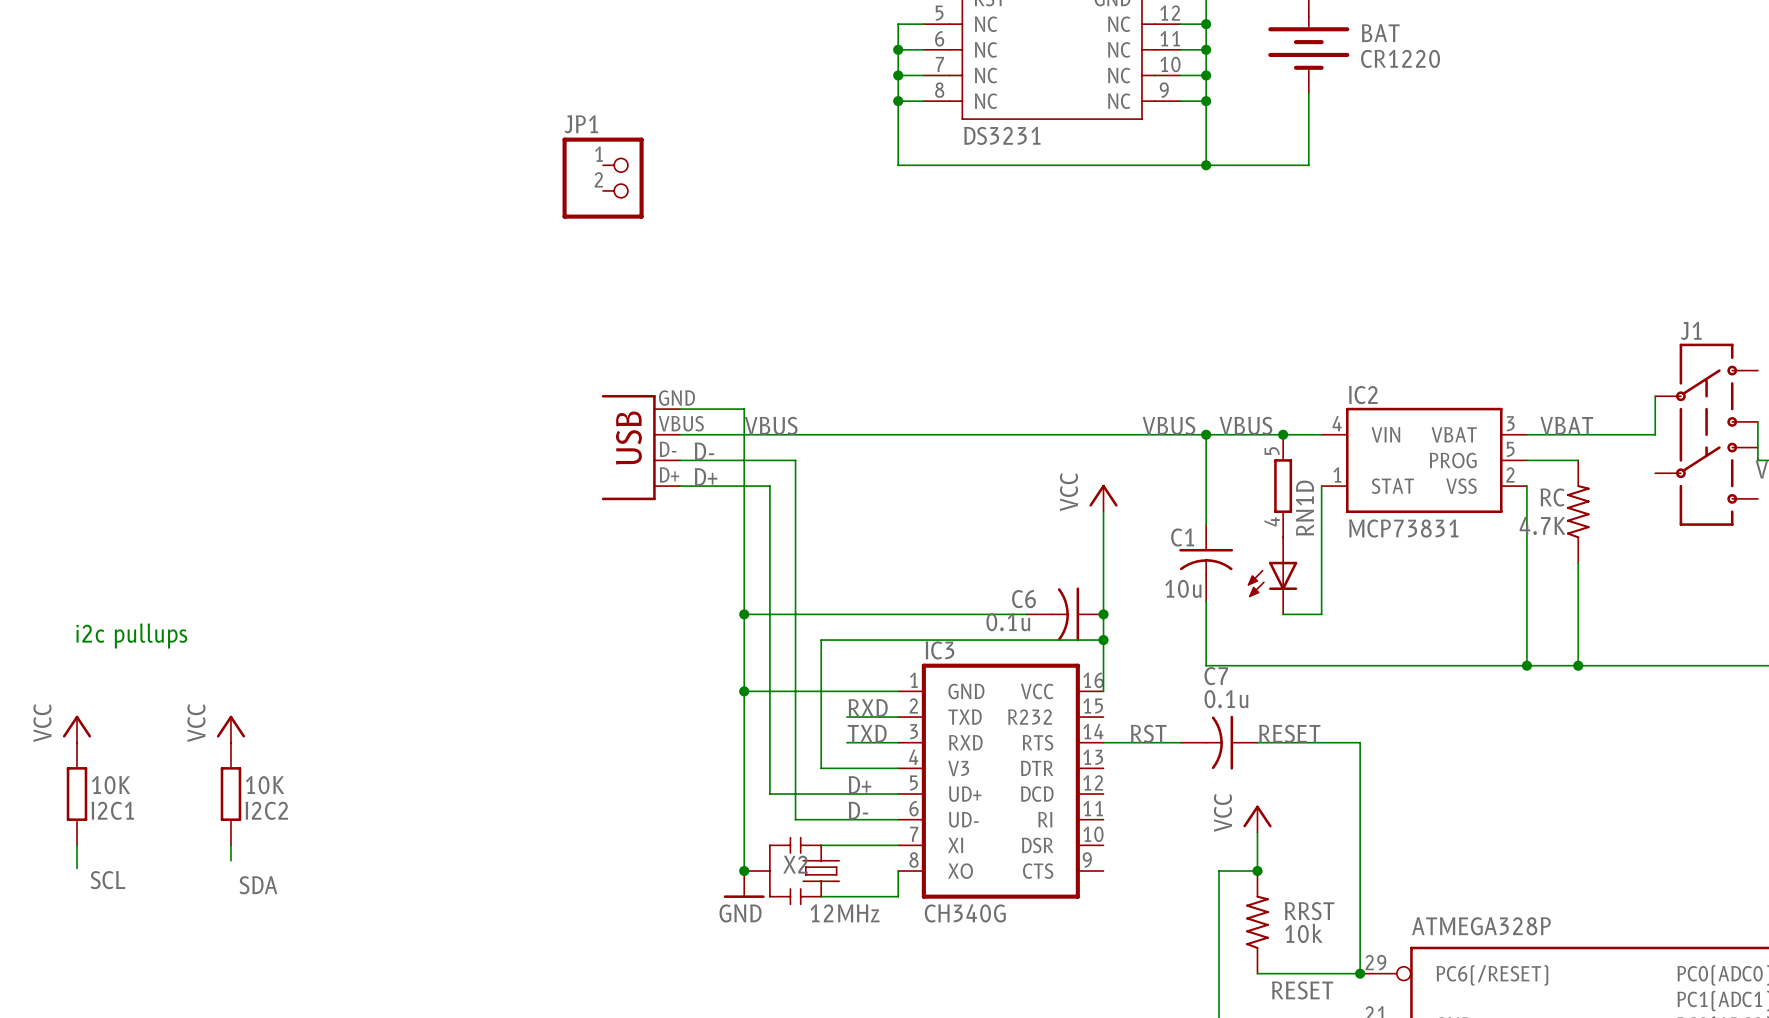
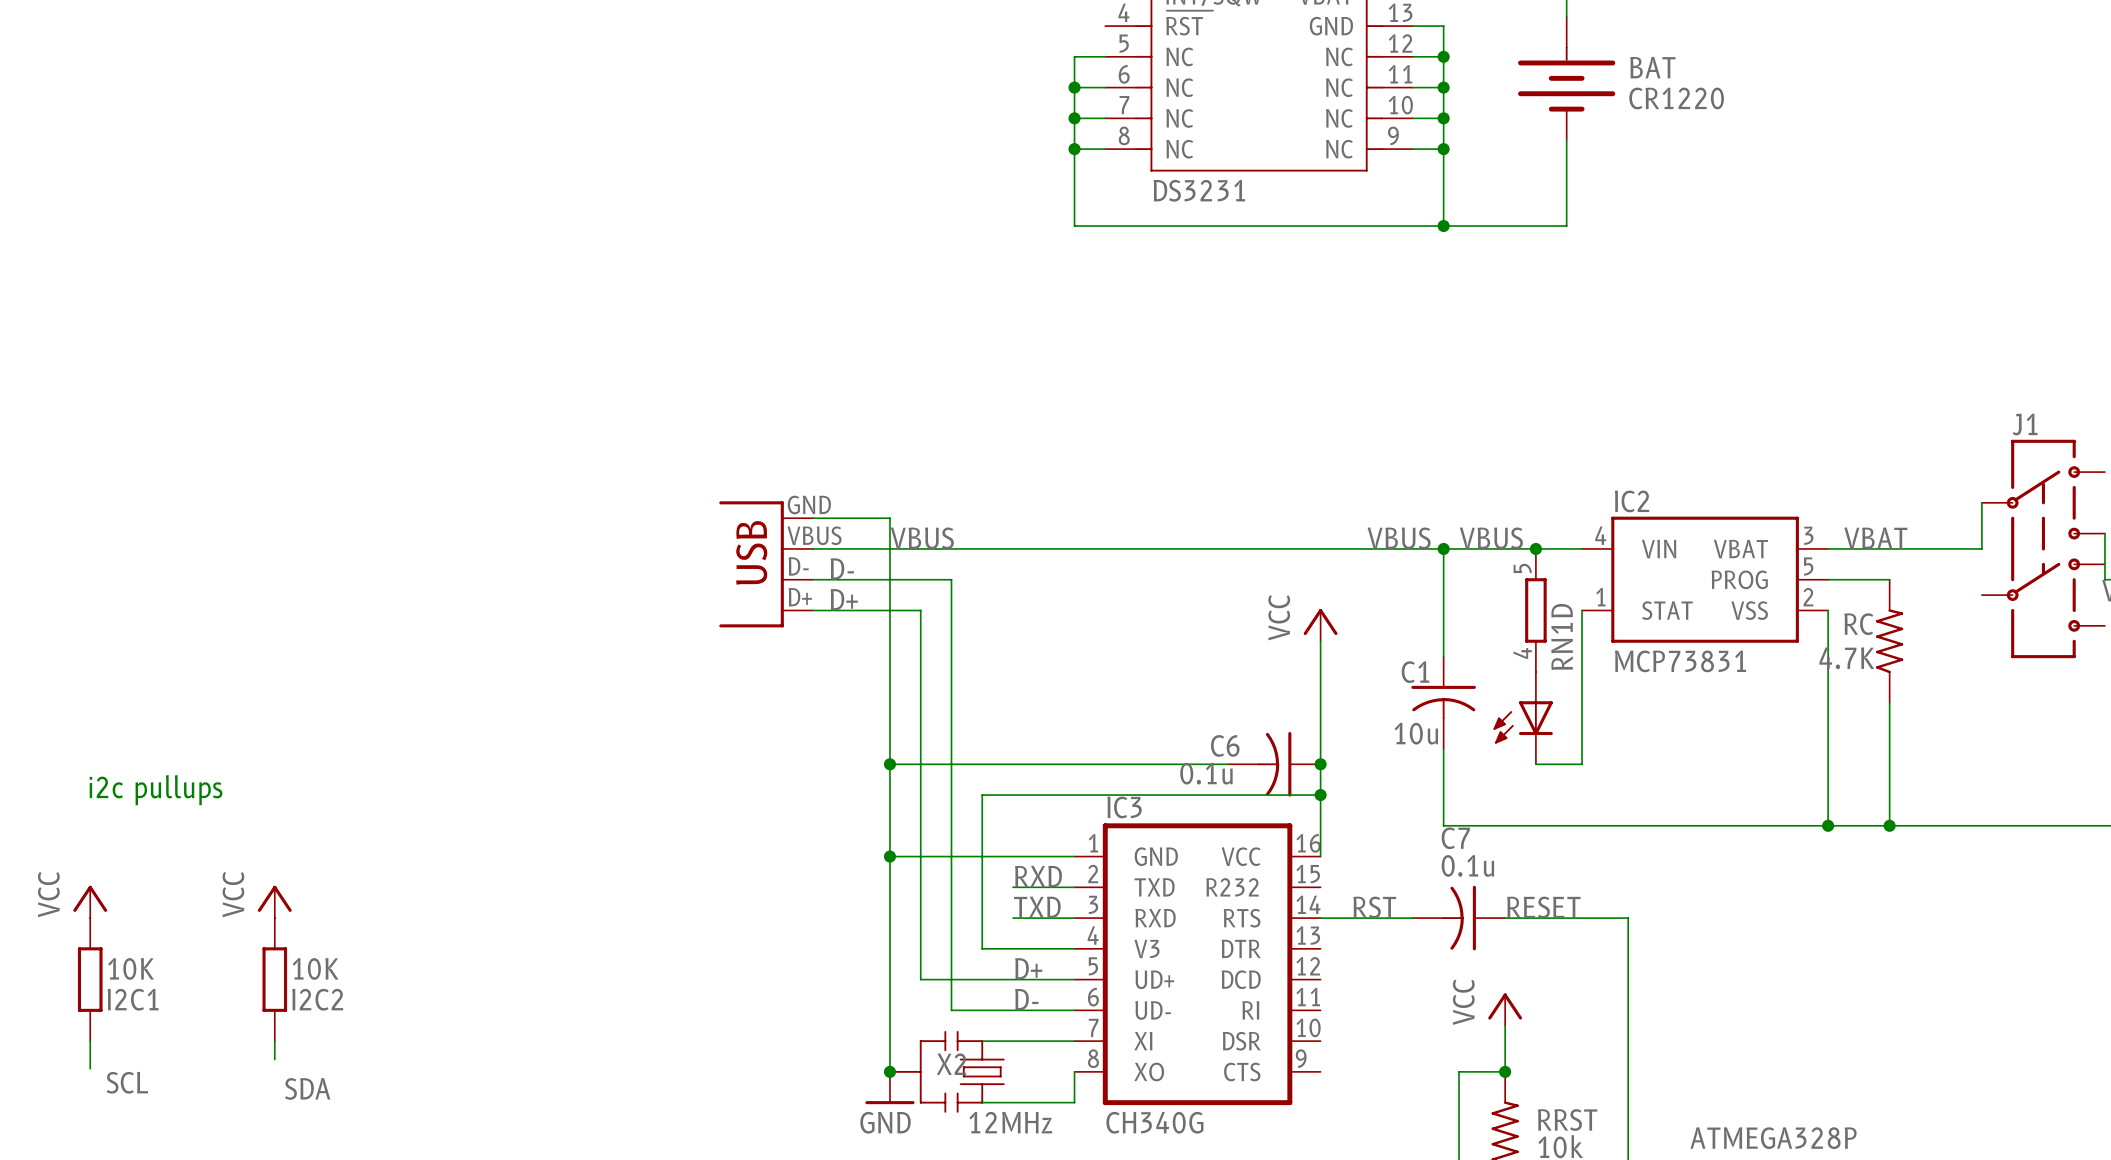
JP1: (603, 178) -> none

